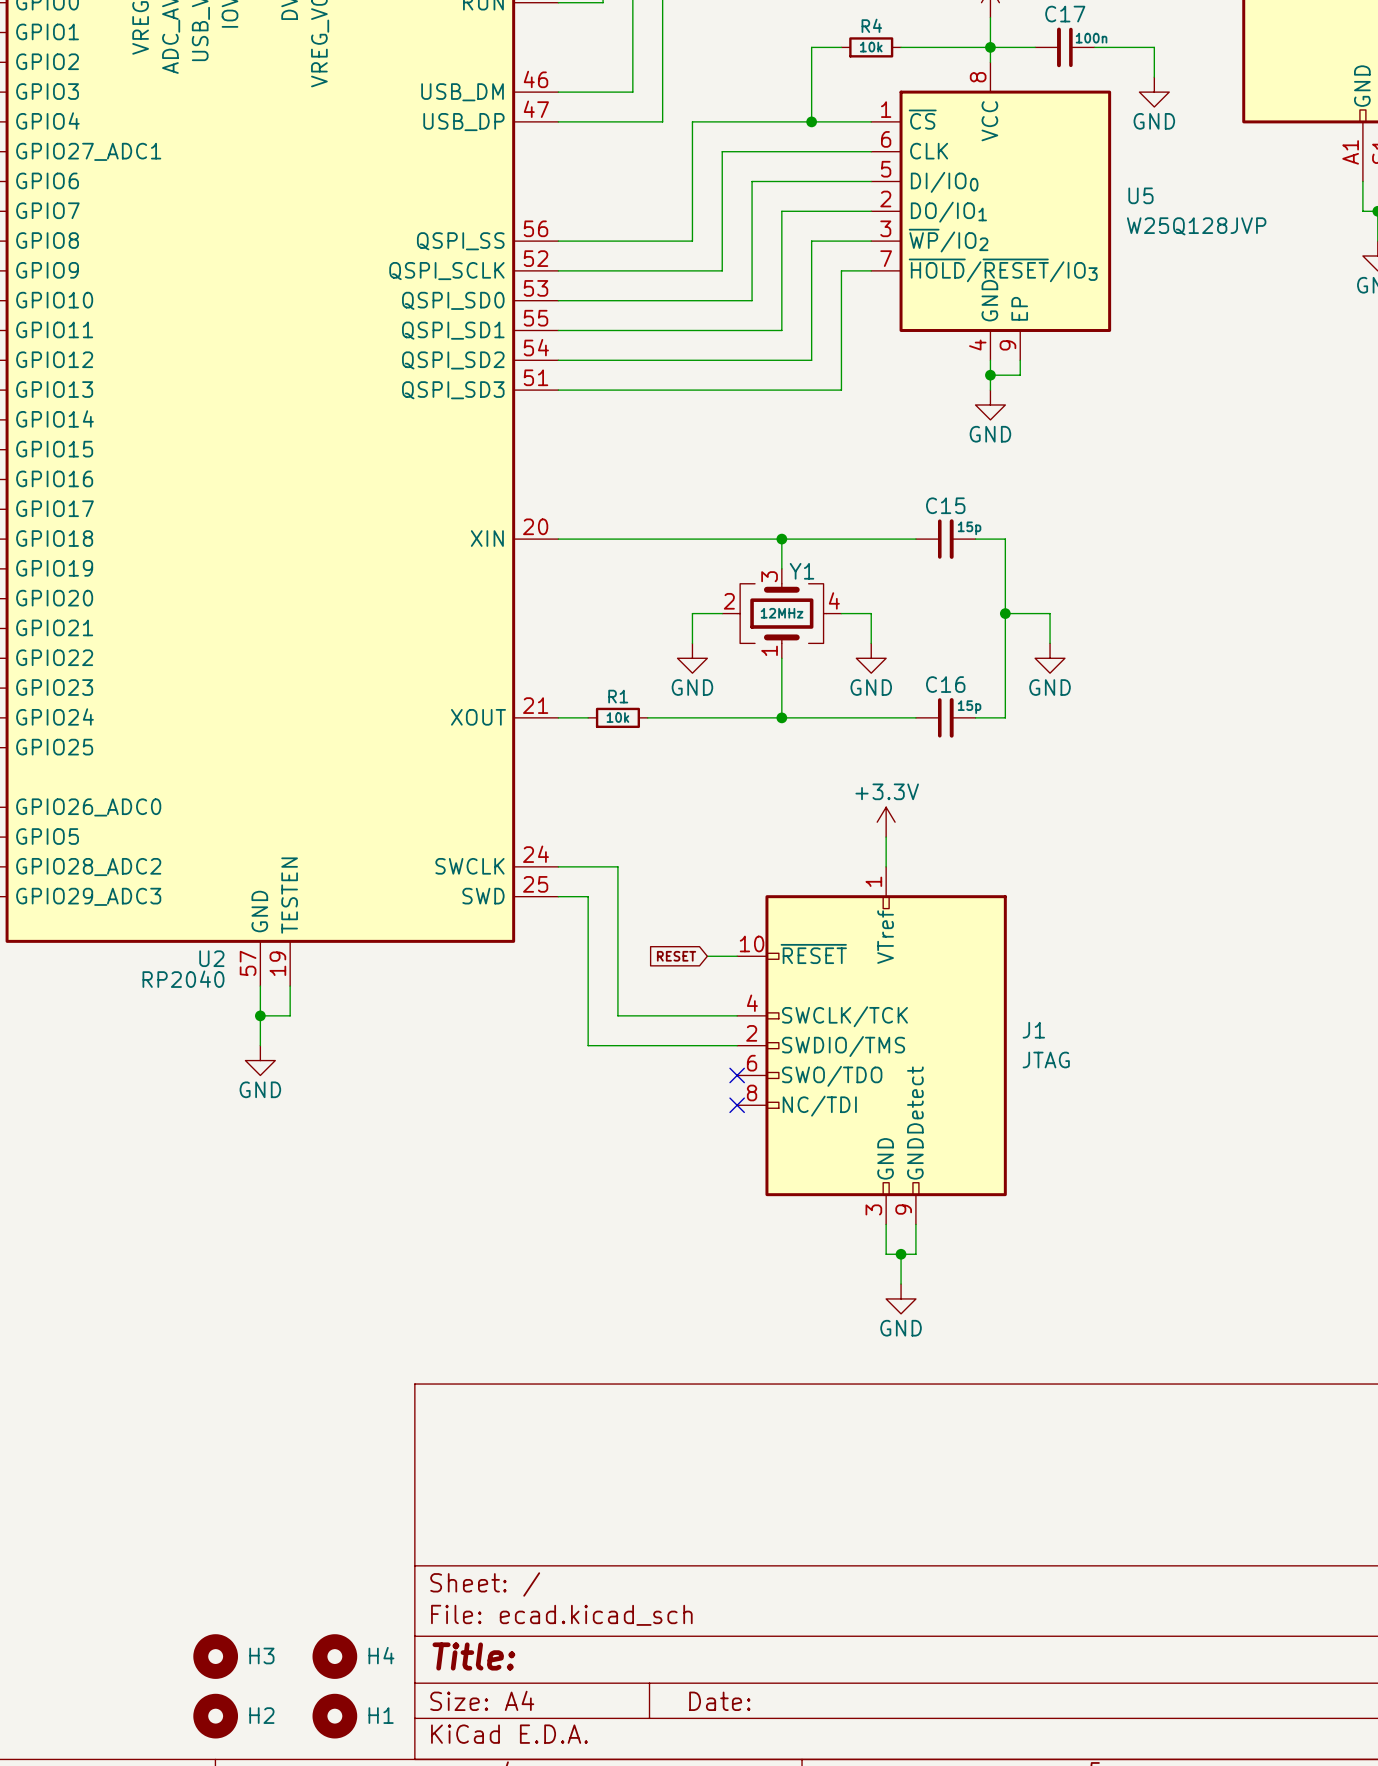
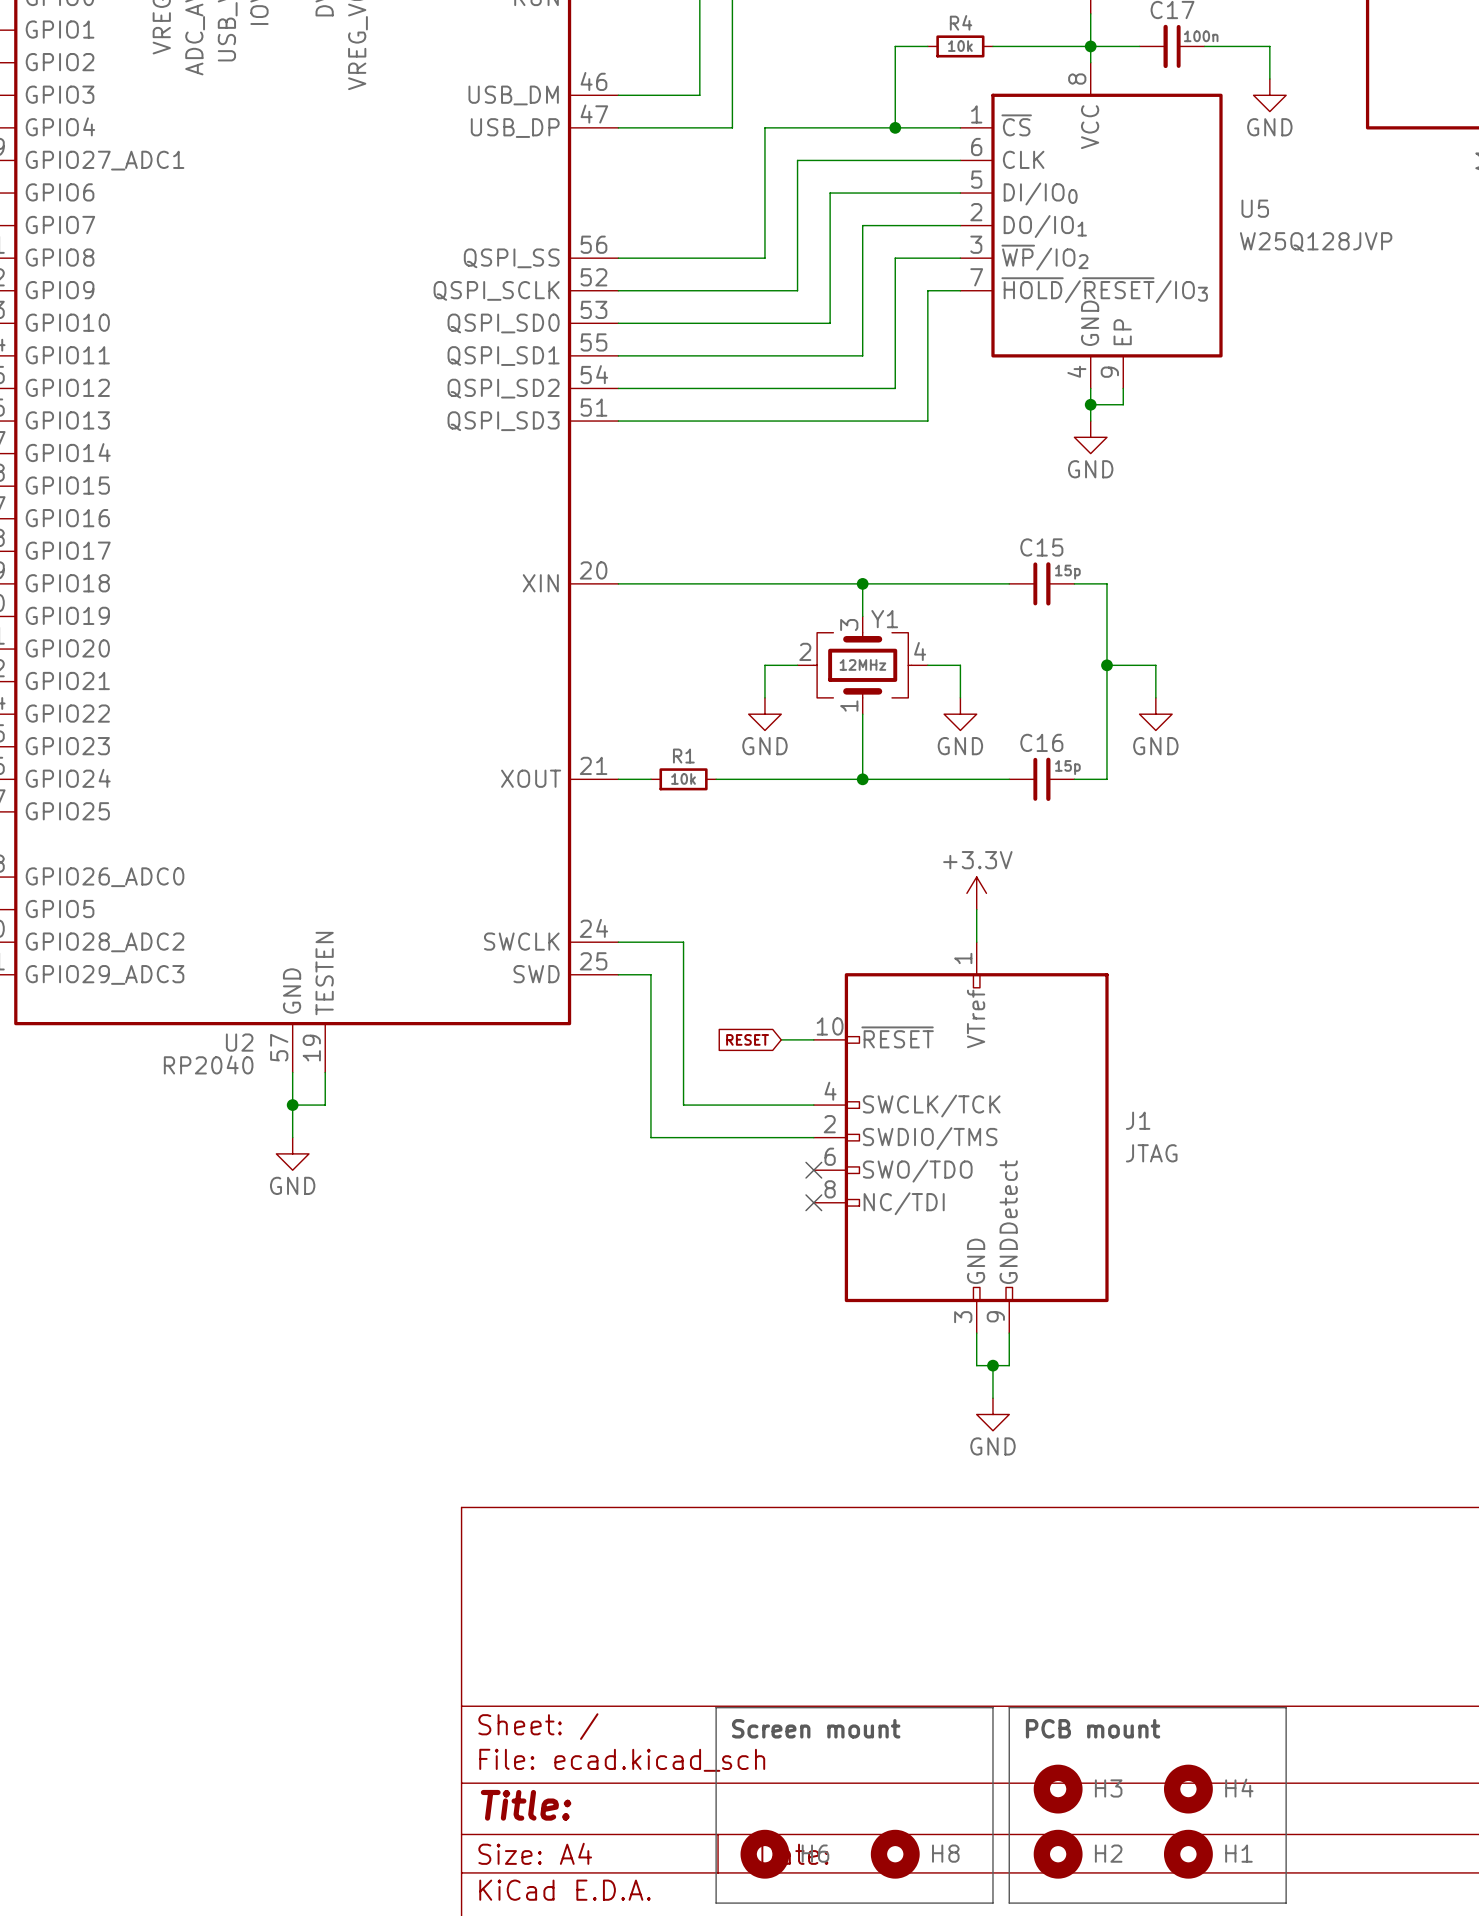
line: none -> (716, 1707) (992, 1707) (992, 1903) (716, 1903) (716, 1707)
line: none -> (1009, 1707) (1286, 1707) (1286, 1903) (1009, 1903) (1009, 1707)
text: none -> Screen mount (816, 1728)
text: none -> PCB mount (1093, 1728)
H3 position: (215, 1656) -> (1058, 1789)
H4 position: (334, 1656) -> (1188, 1789)
H6: none -> (764, 1854)
H8: none -> (895, 1854)
H2 position: (215, 1716) -> (1058, 1854)
H1 position: (334, 1716) -> (1188, 1854)

